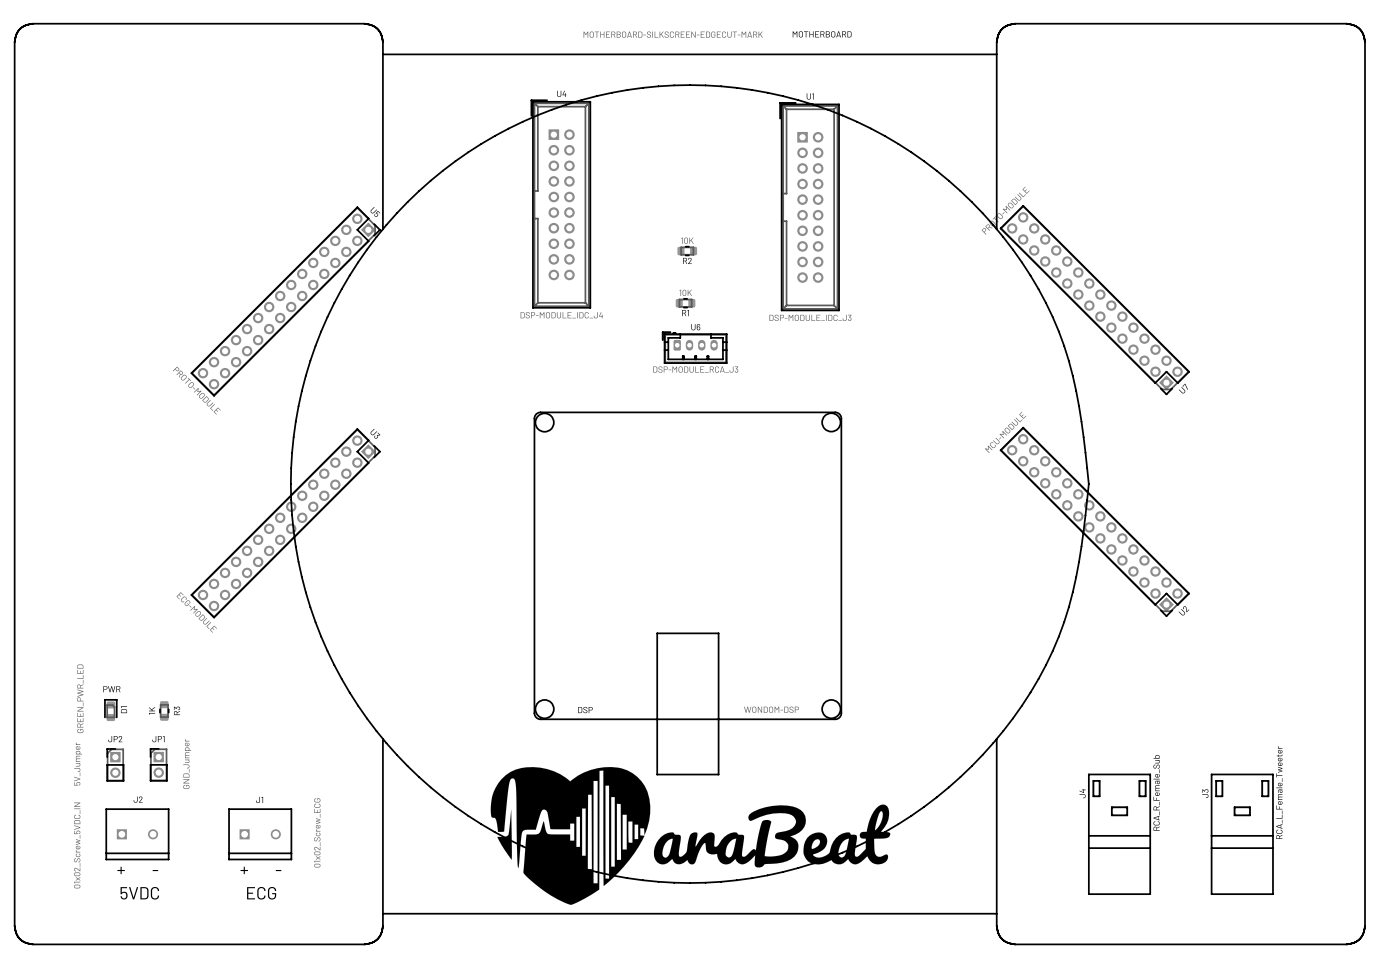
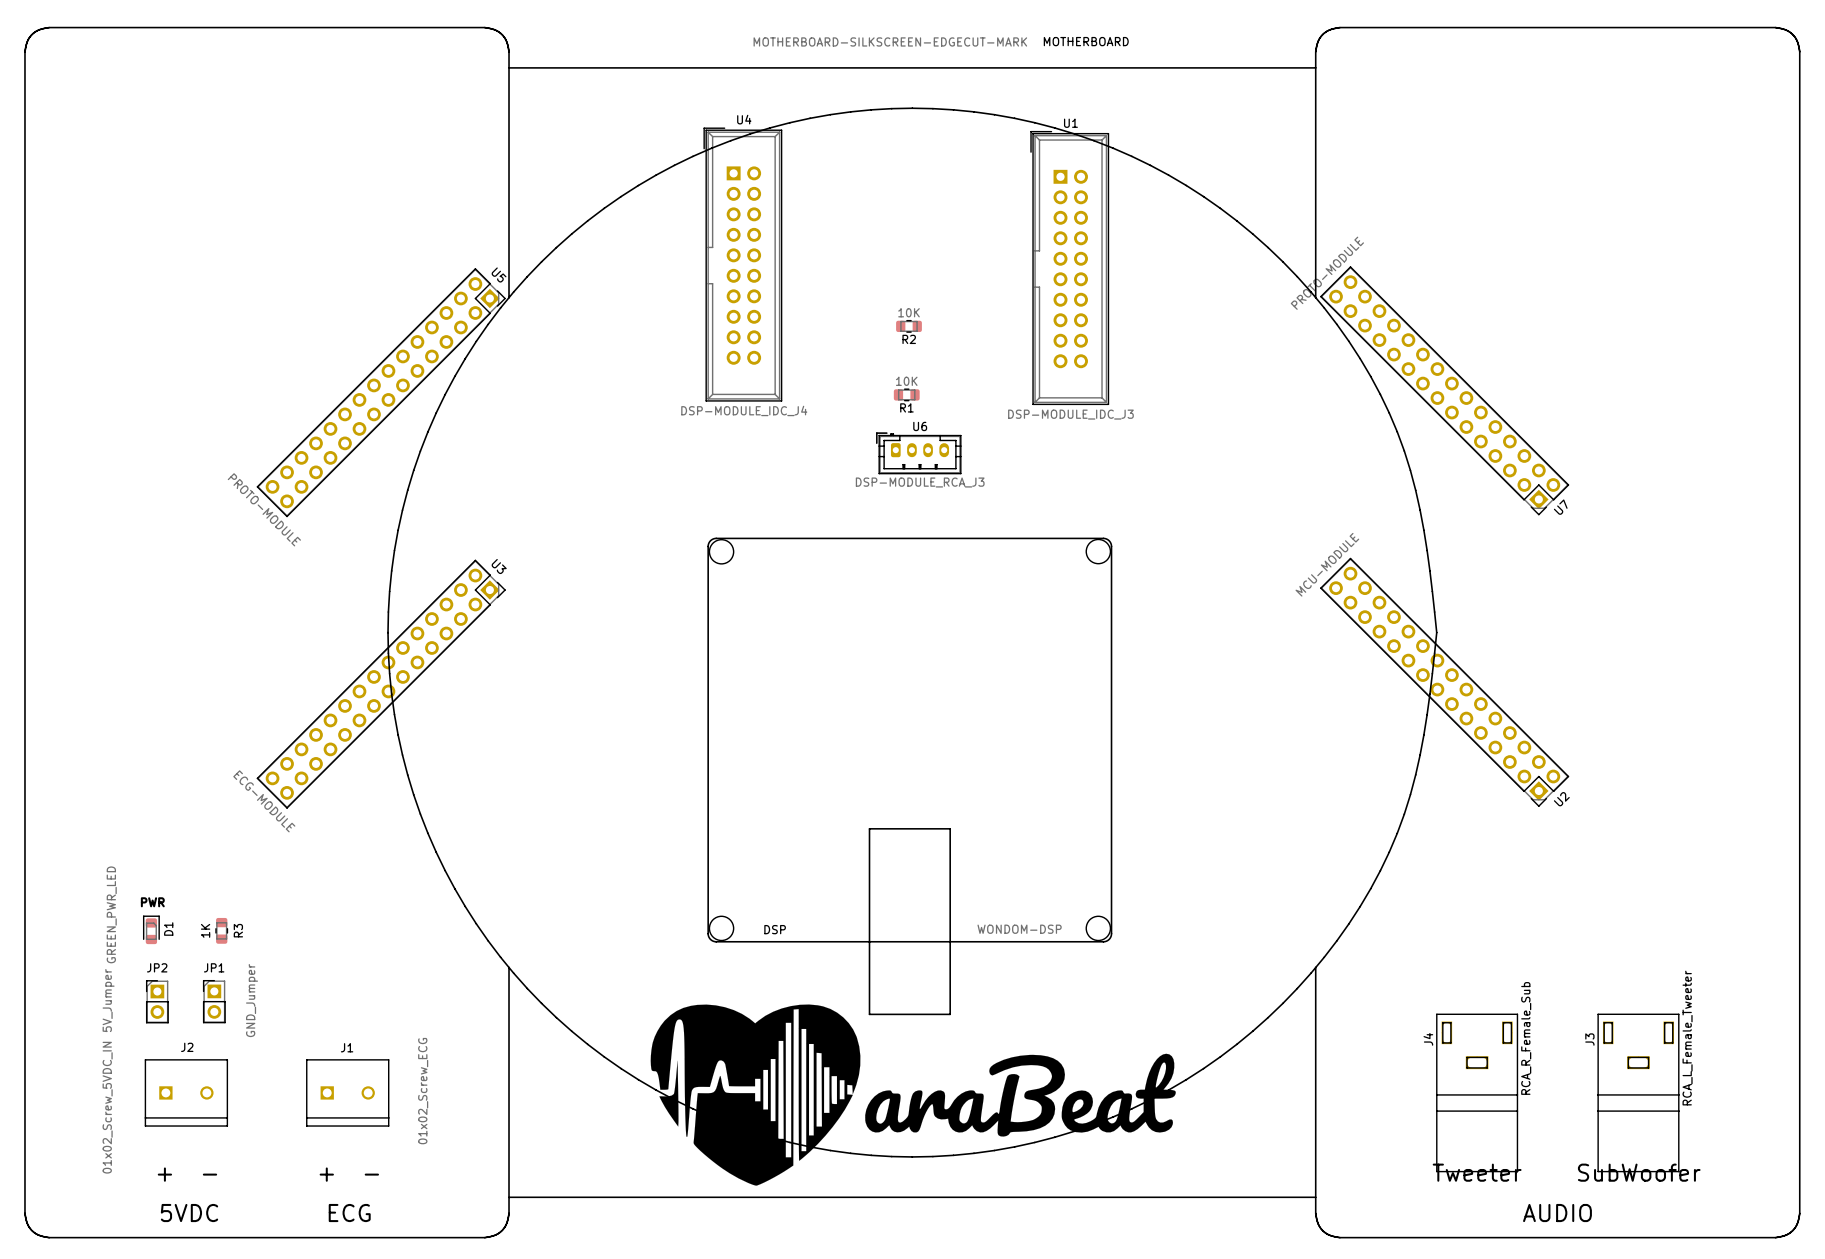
text position: + (121, 870) -> + (164, 1174)
text position: - (155, 870) -> - (209, 1174)
text position: + (244, 870) -> + (326, 1174)
text position: - (278, 870) -> - (371, 1174)
text position: 5VDC (139, 893) -> 5VDC (189, 1213)
text position: ECG (261, 893) -> ECG (349, 1213)
text: none -> SubWoofer (1639, 1172)
text: none -> Tweeter (1477, 1172)
text: none -> AUDIO (1557, 1213)

